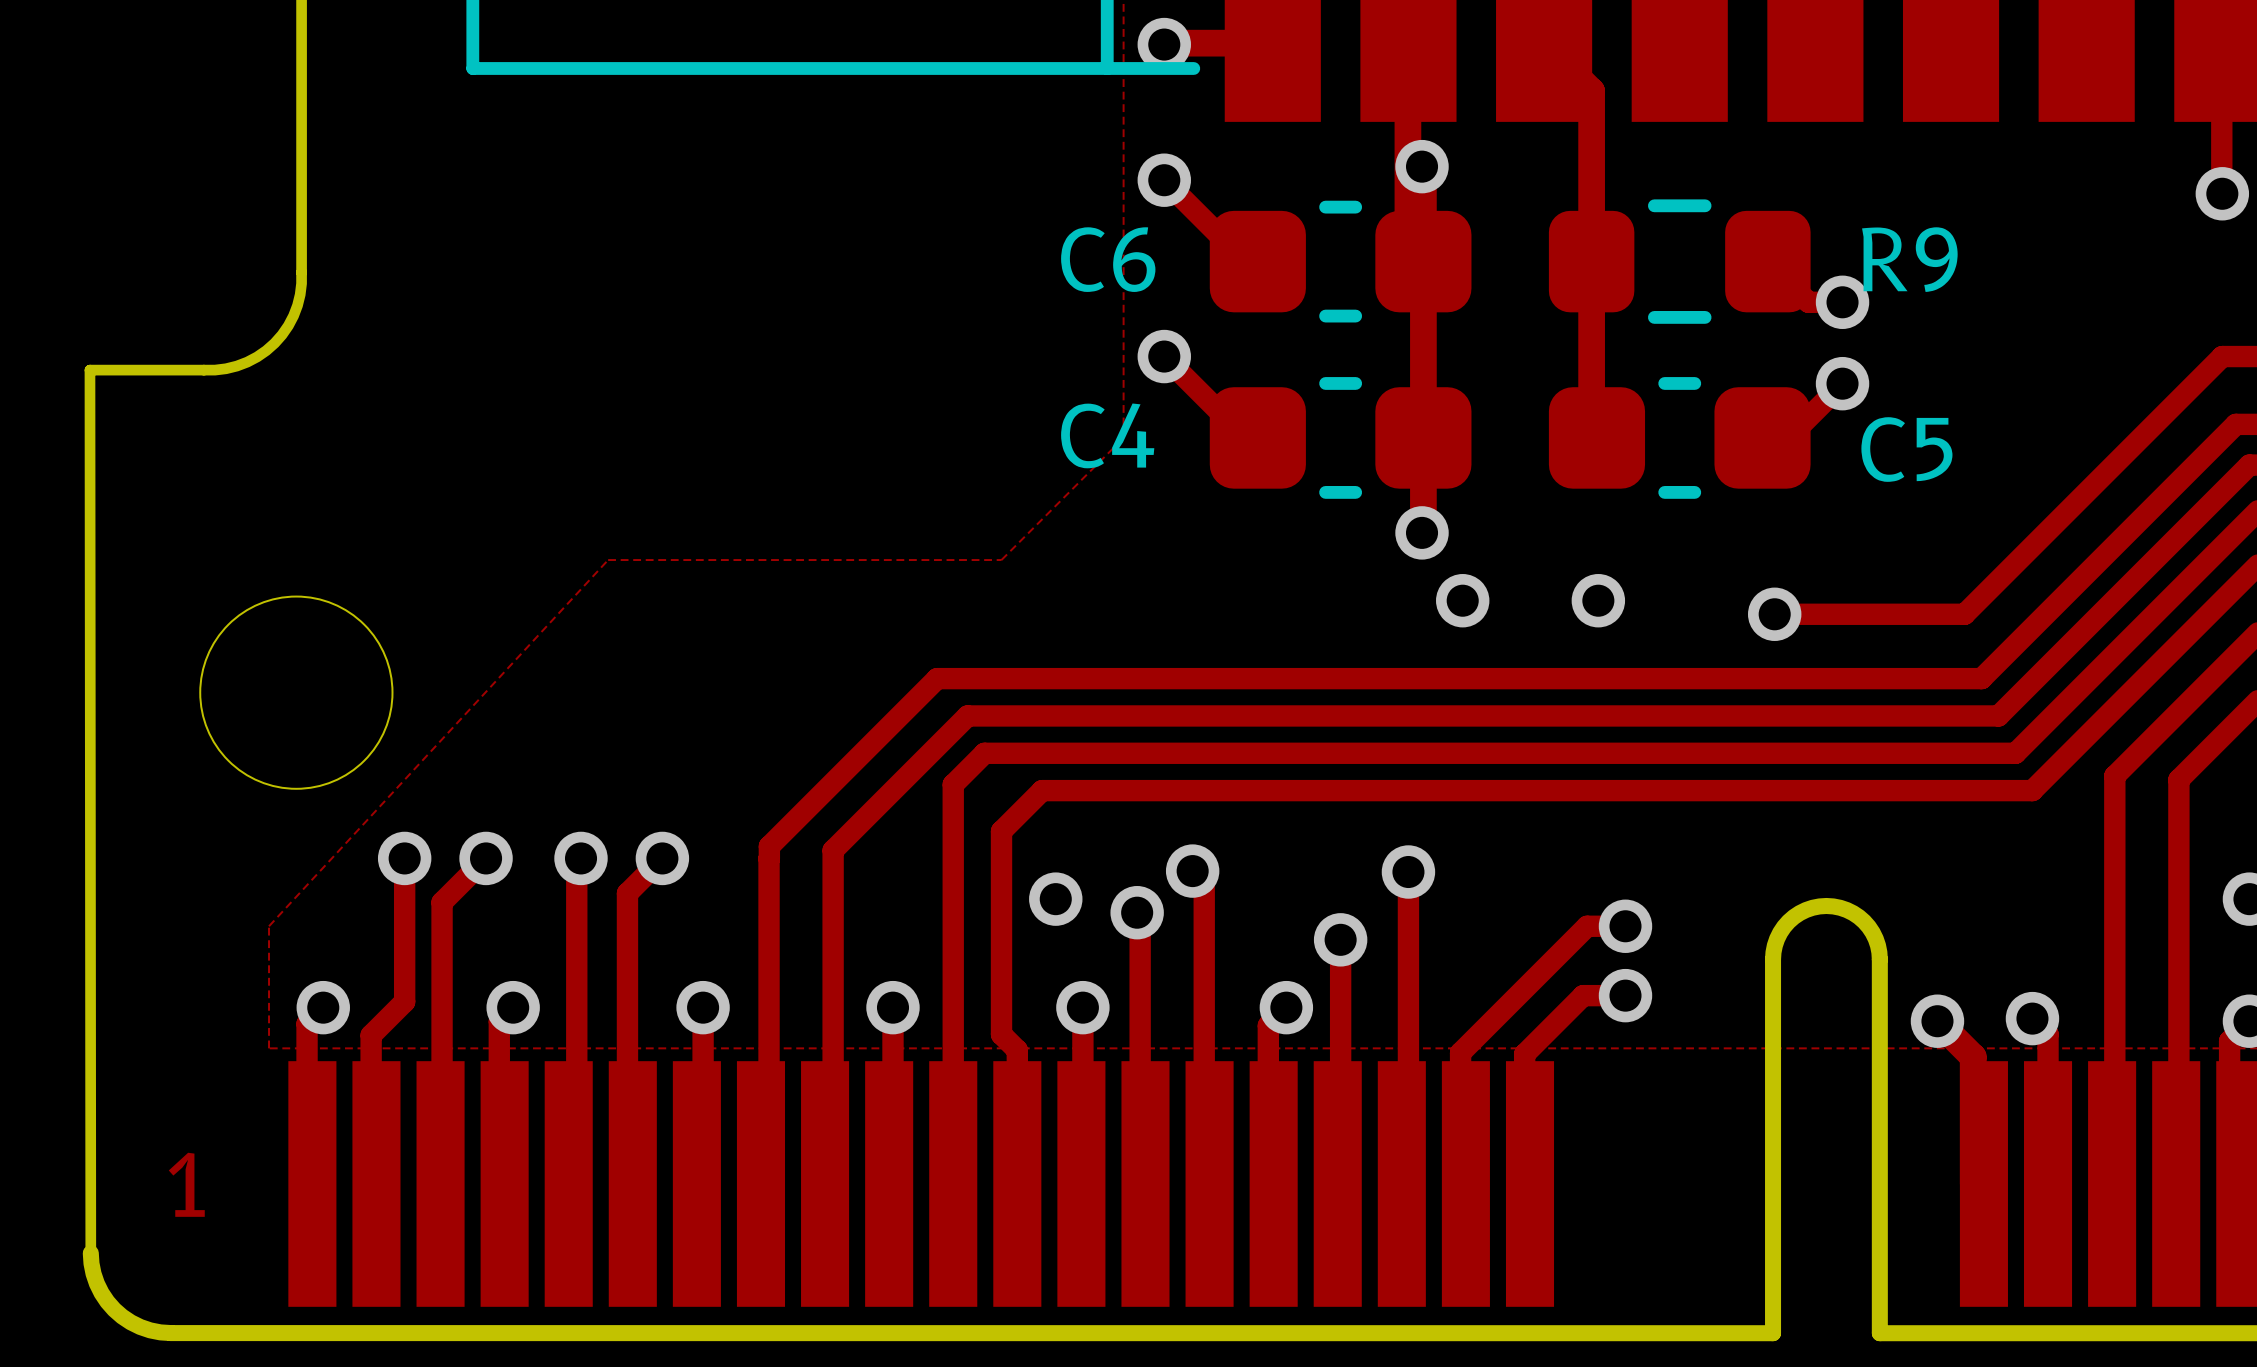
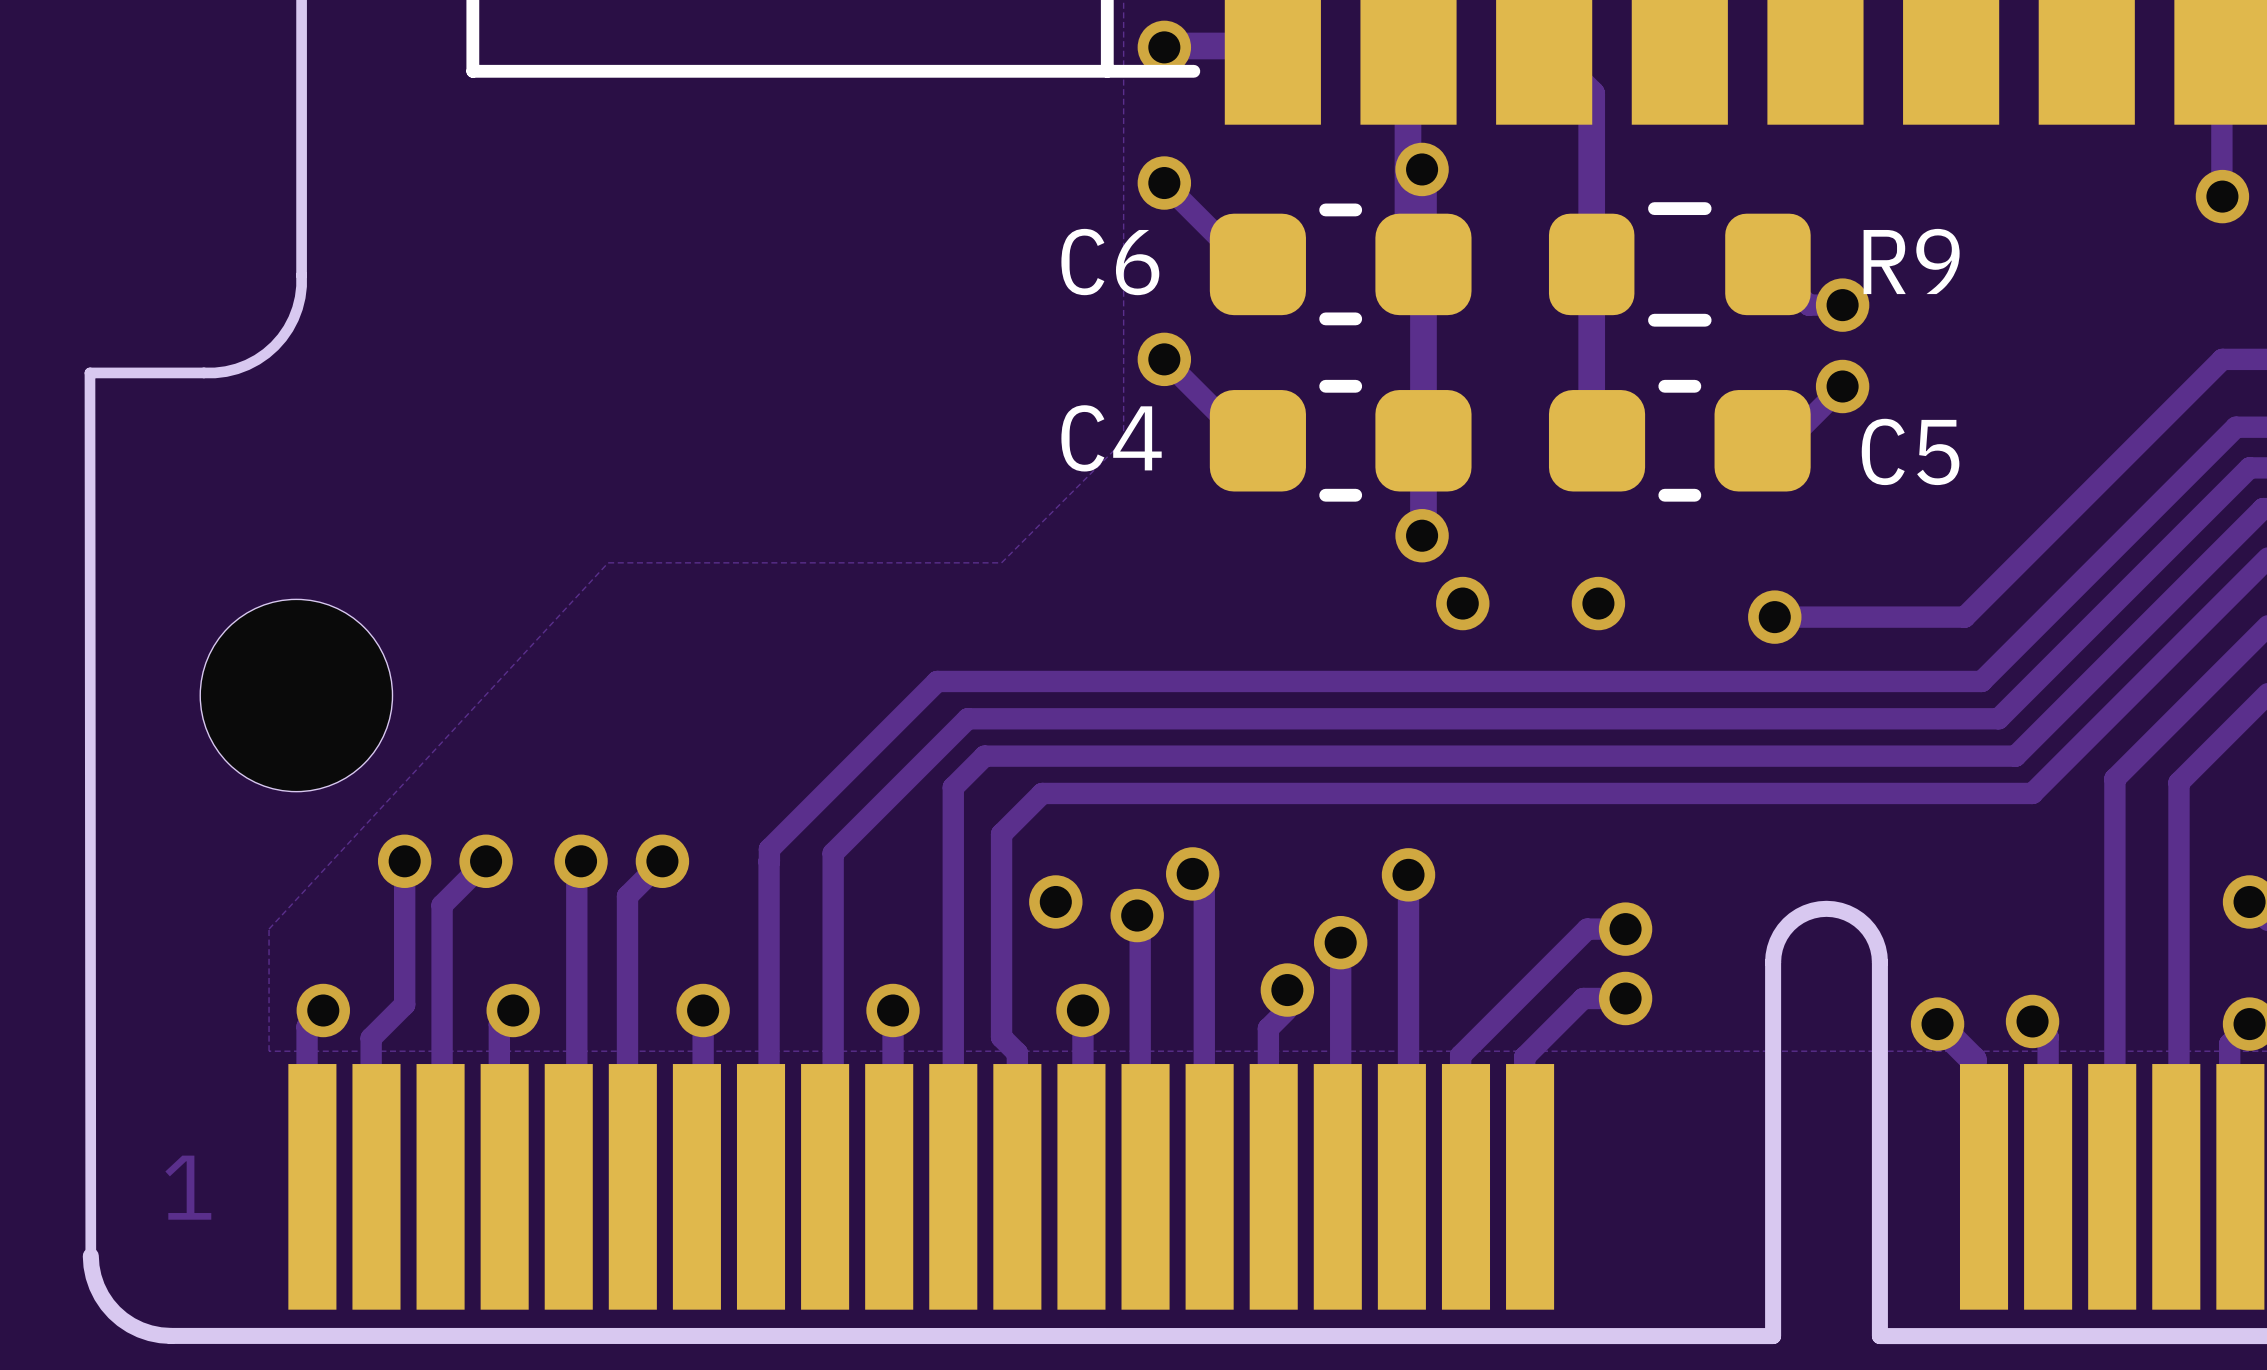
via position: (1286, 1007) -> (1287, 990)

